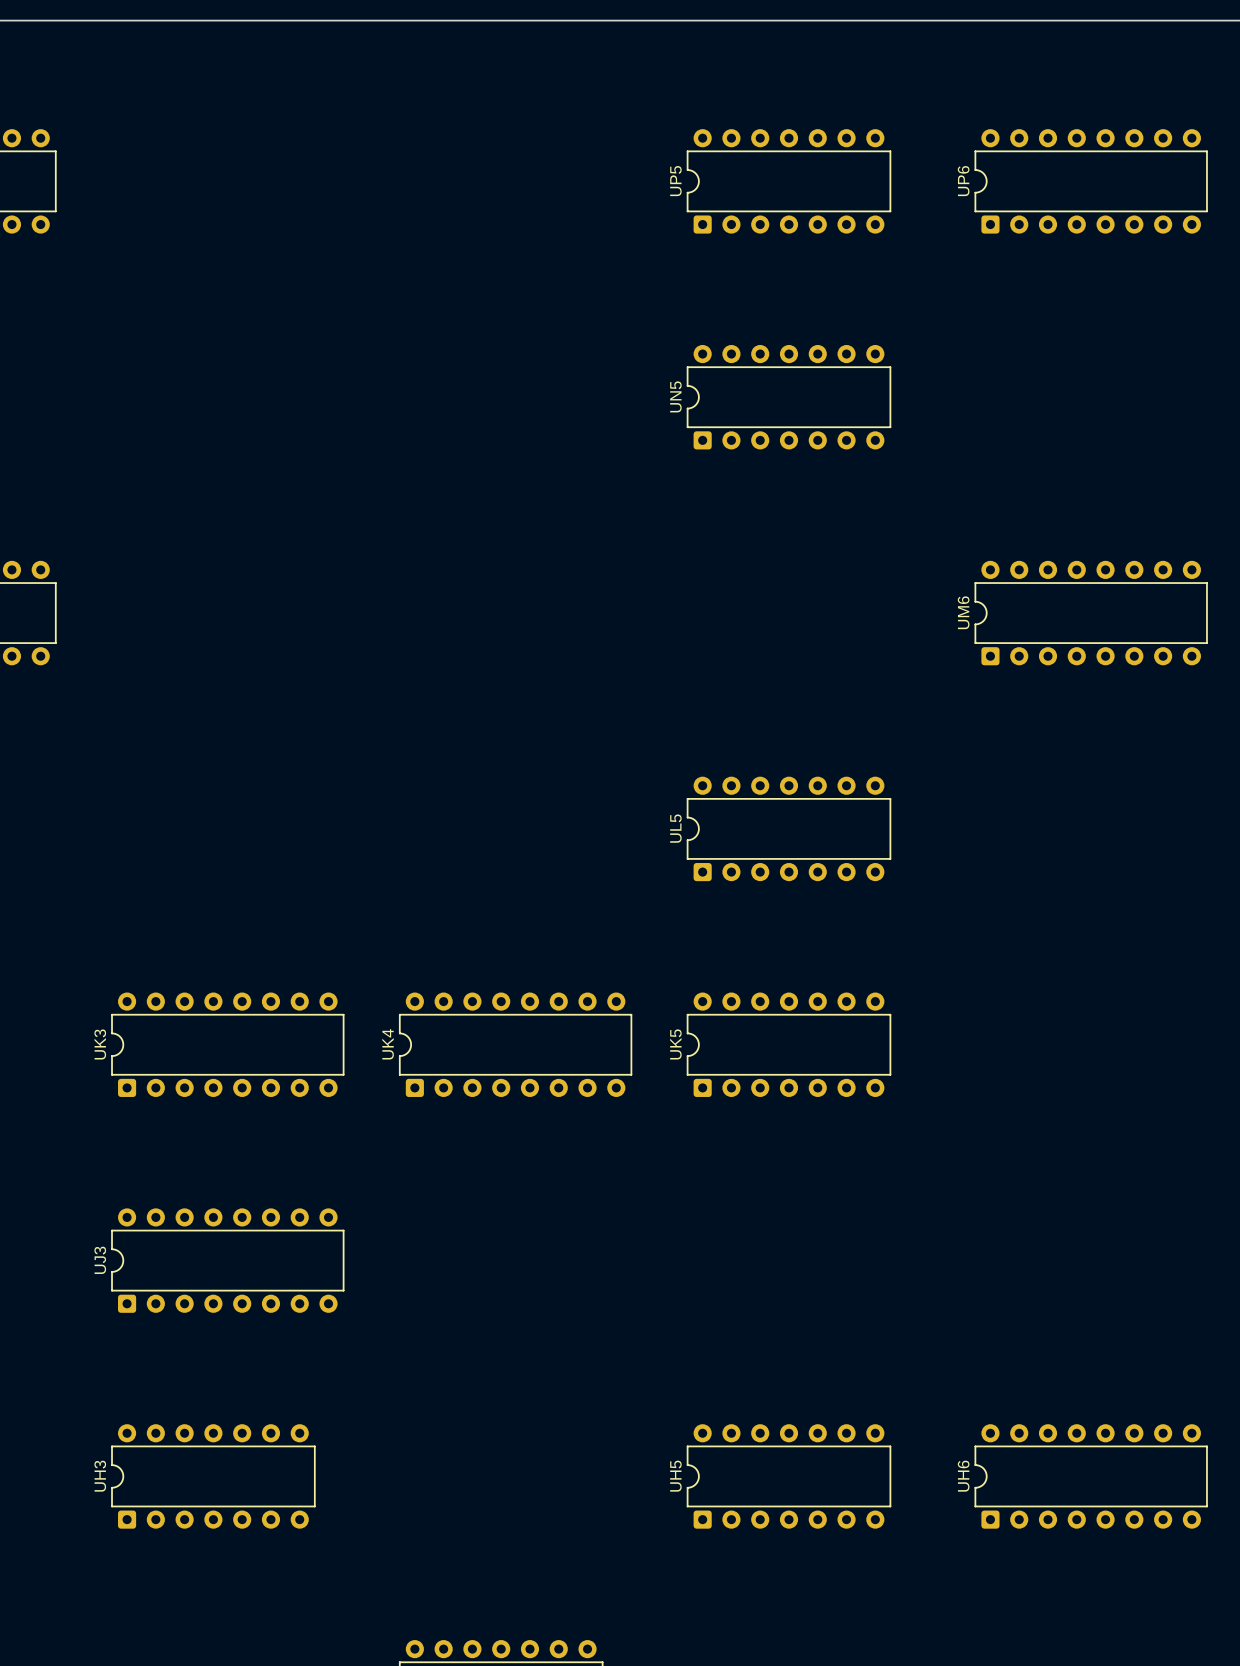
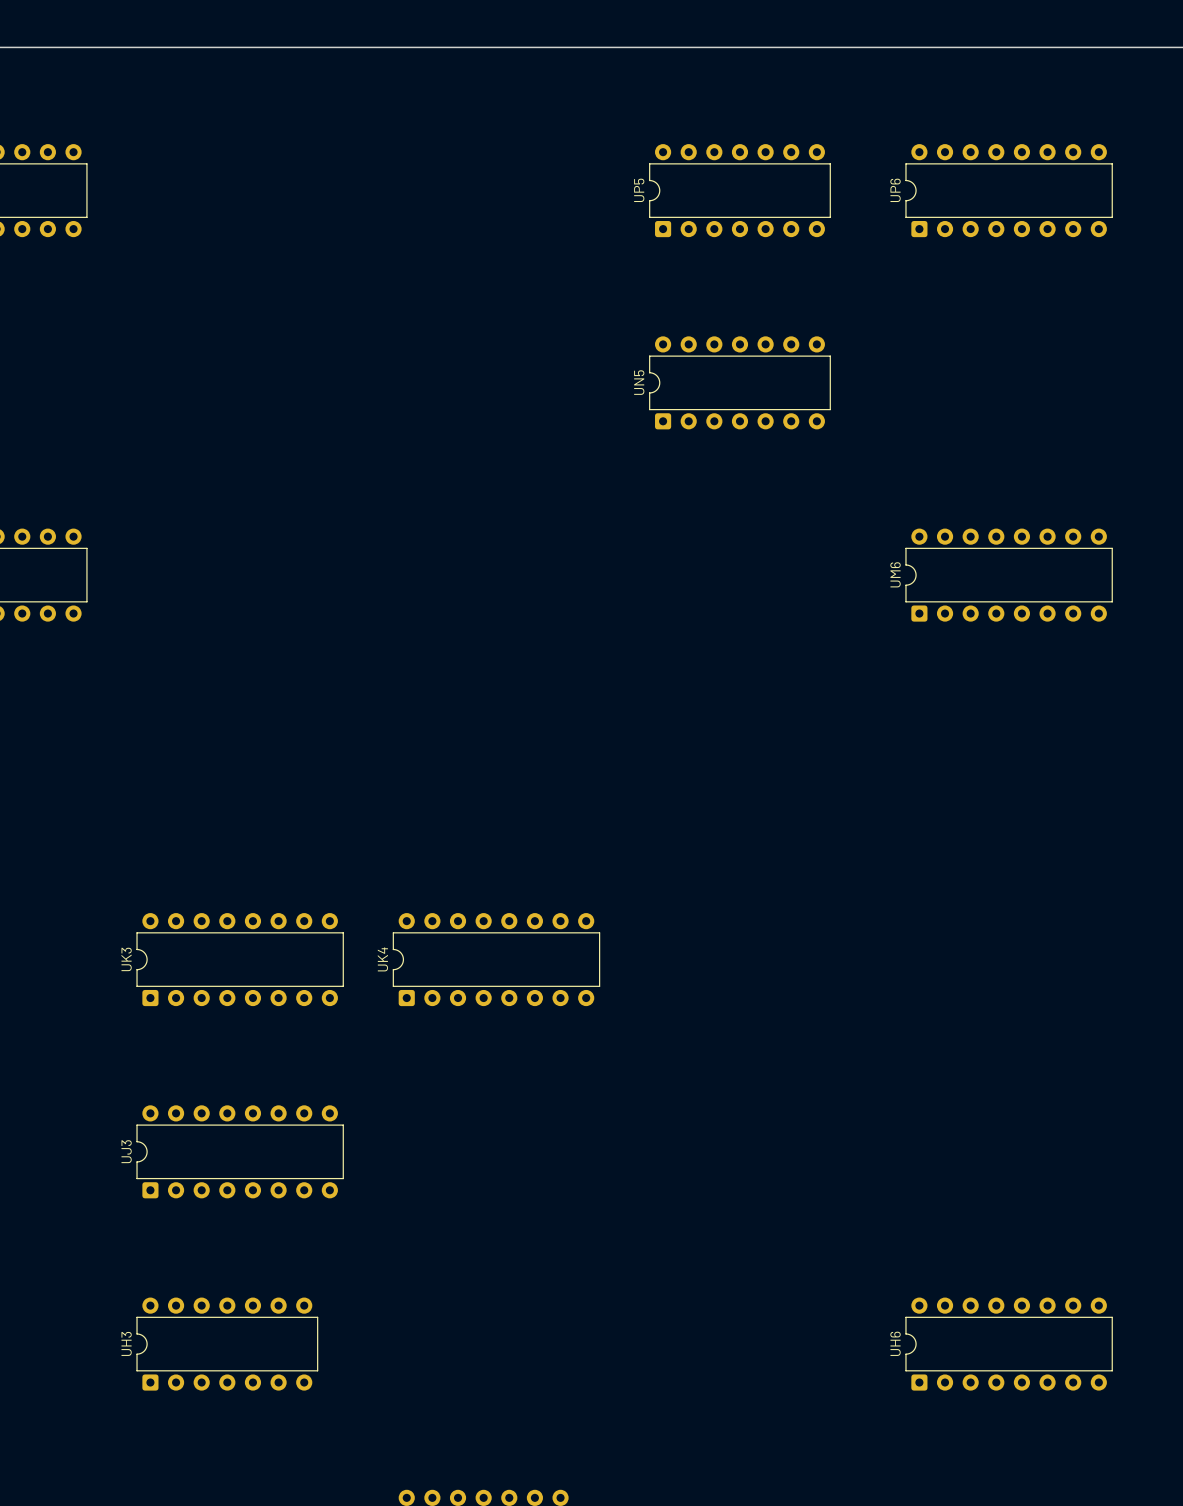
UL5: (789, 828) -> none
UK5: (789, 1044) -> none
UH5: (789, 1476) -> none

